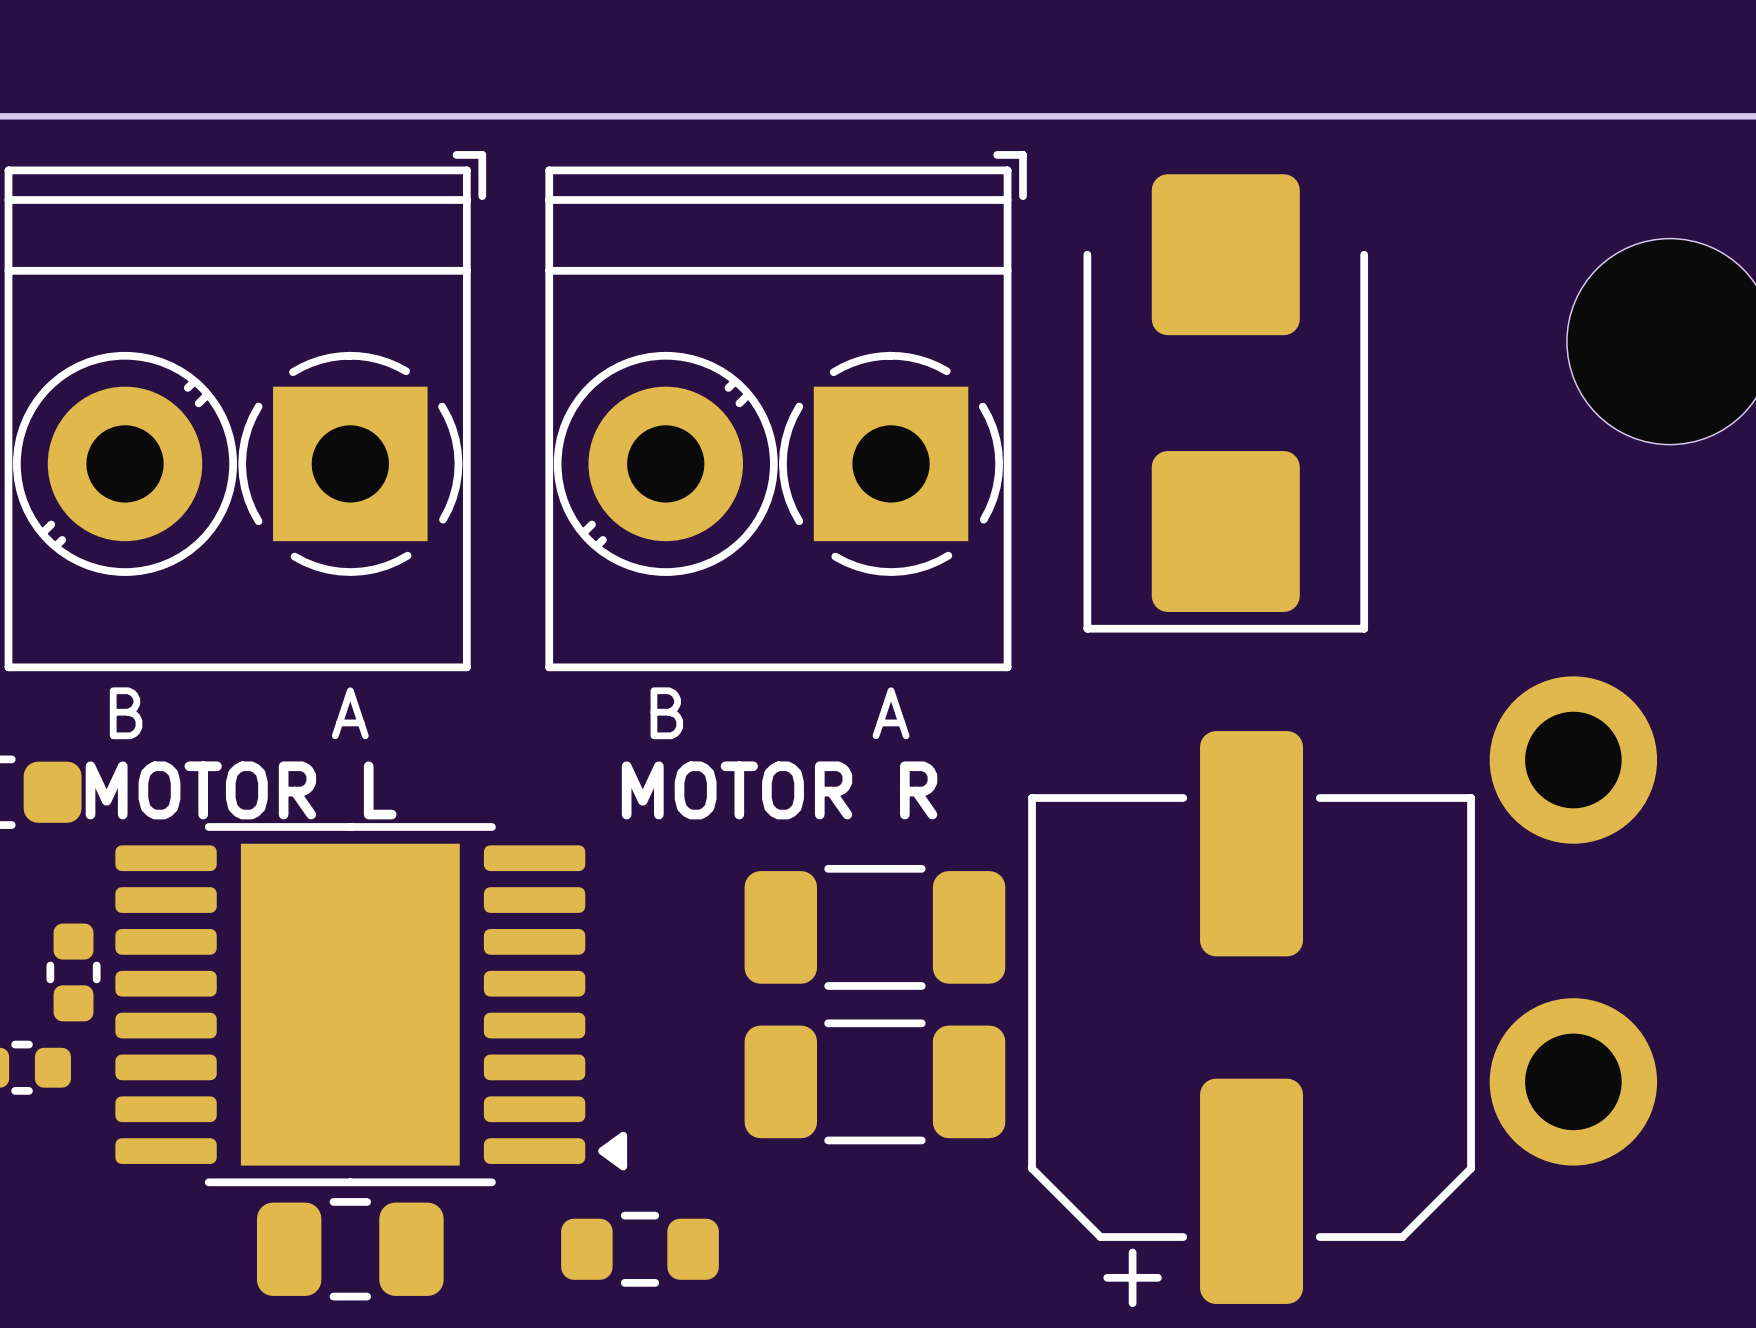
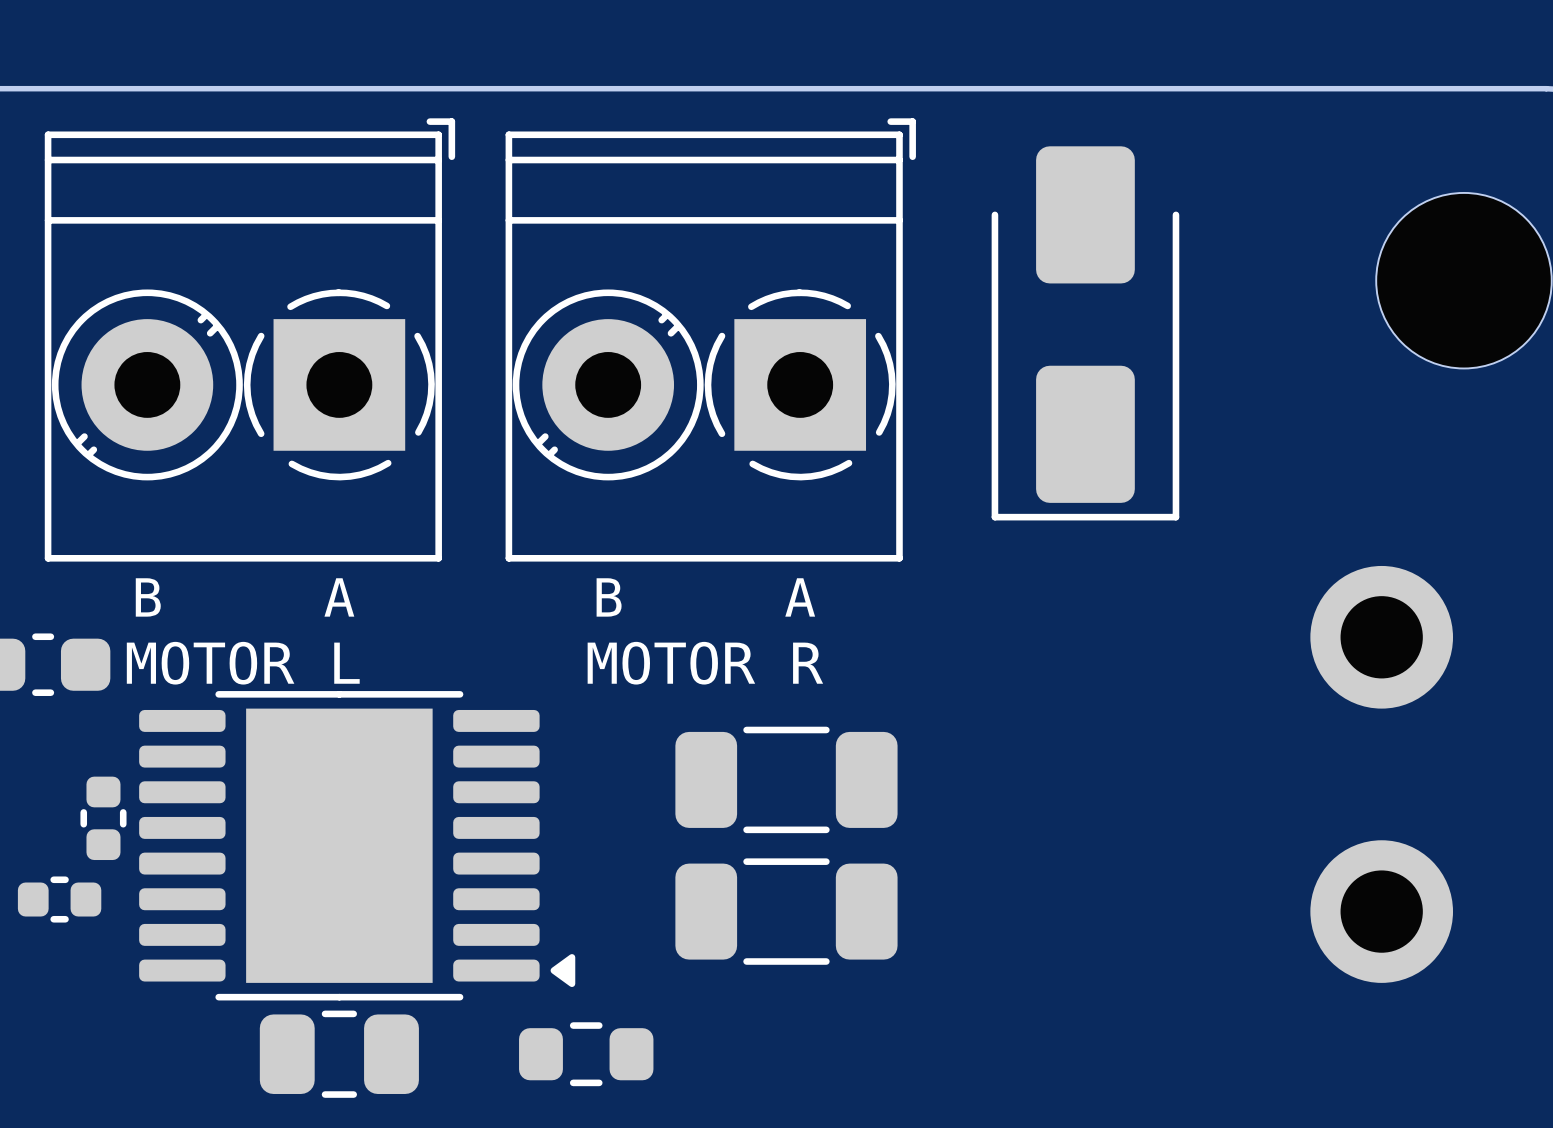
part footprint: [1083, 174, 1369, 633] -> [991, 146, 1180, 521]
part: (1251, 1019) -> none

